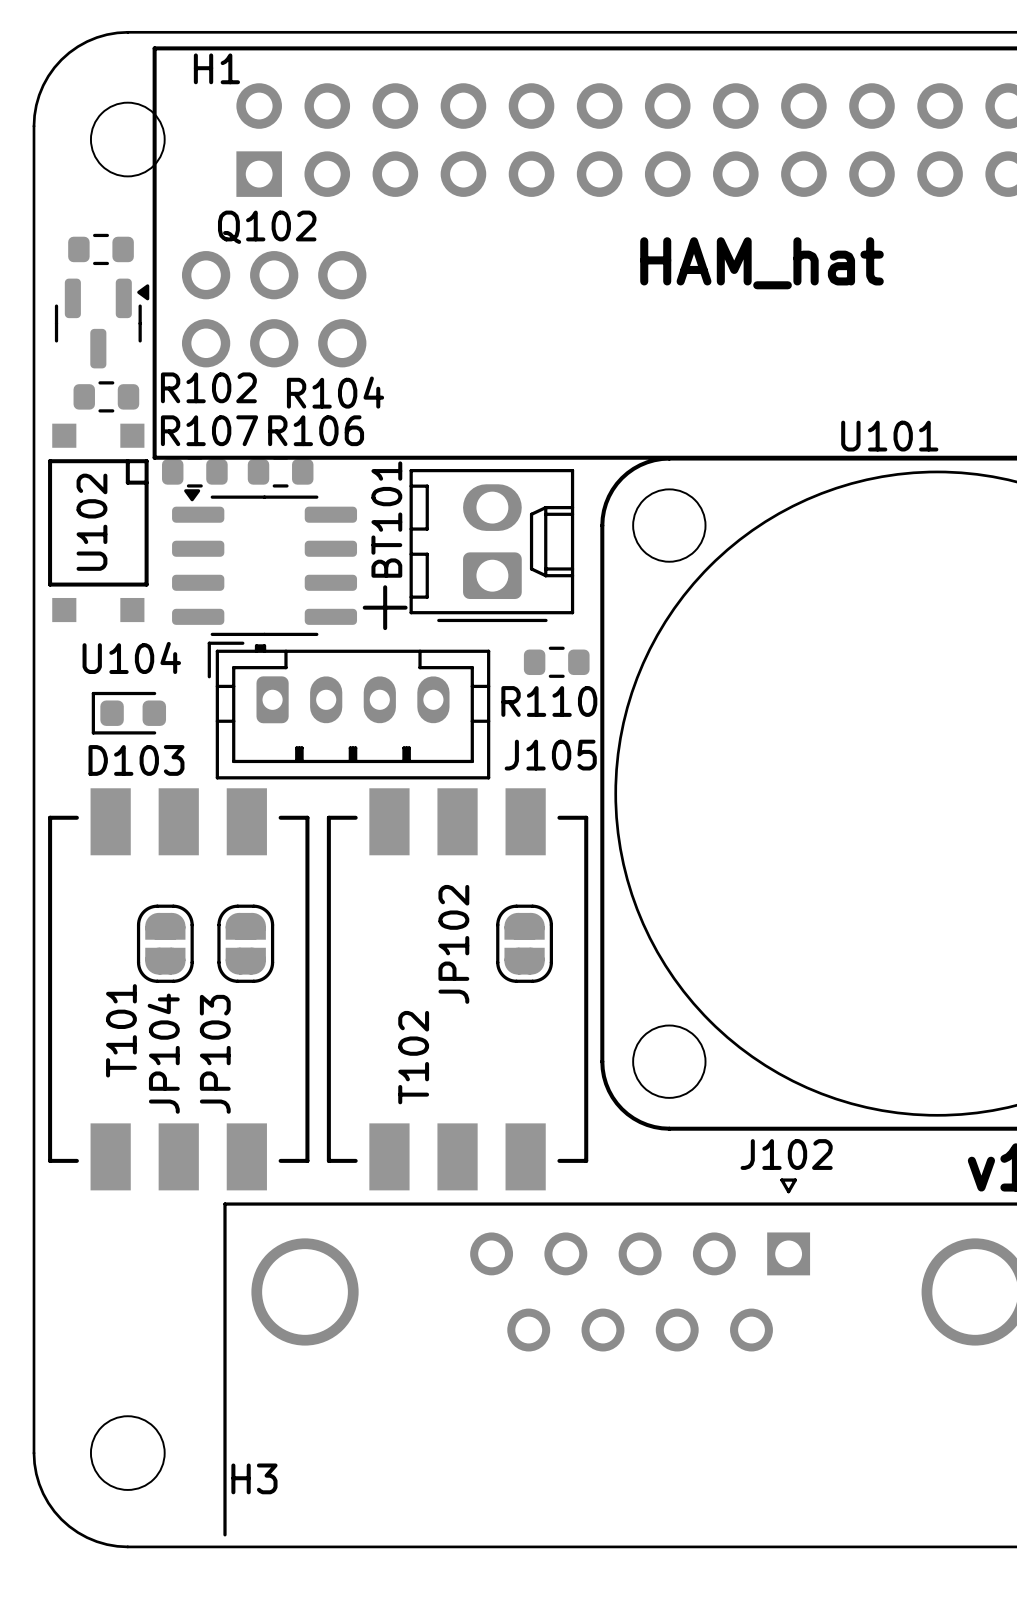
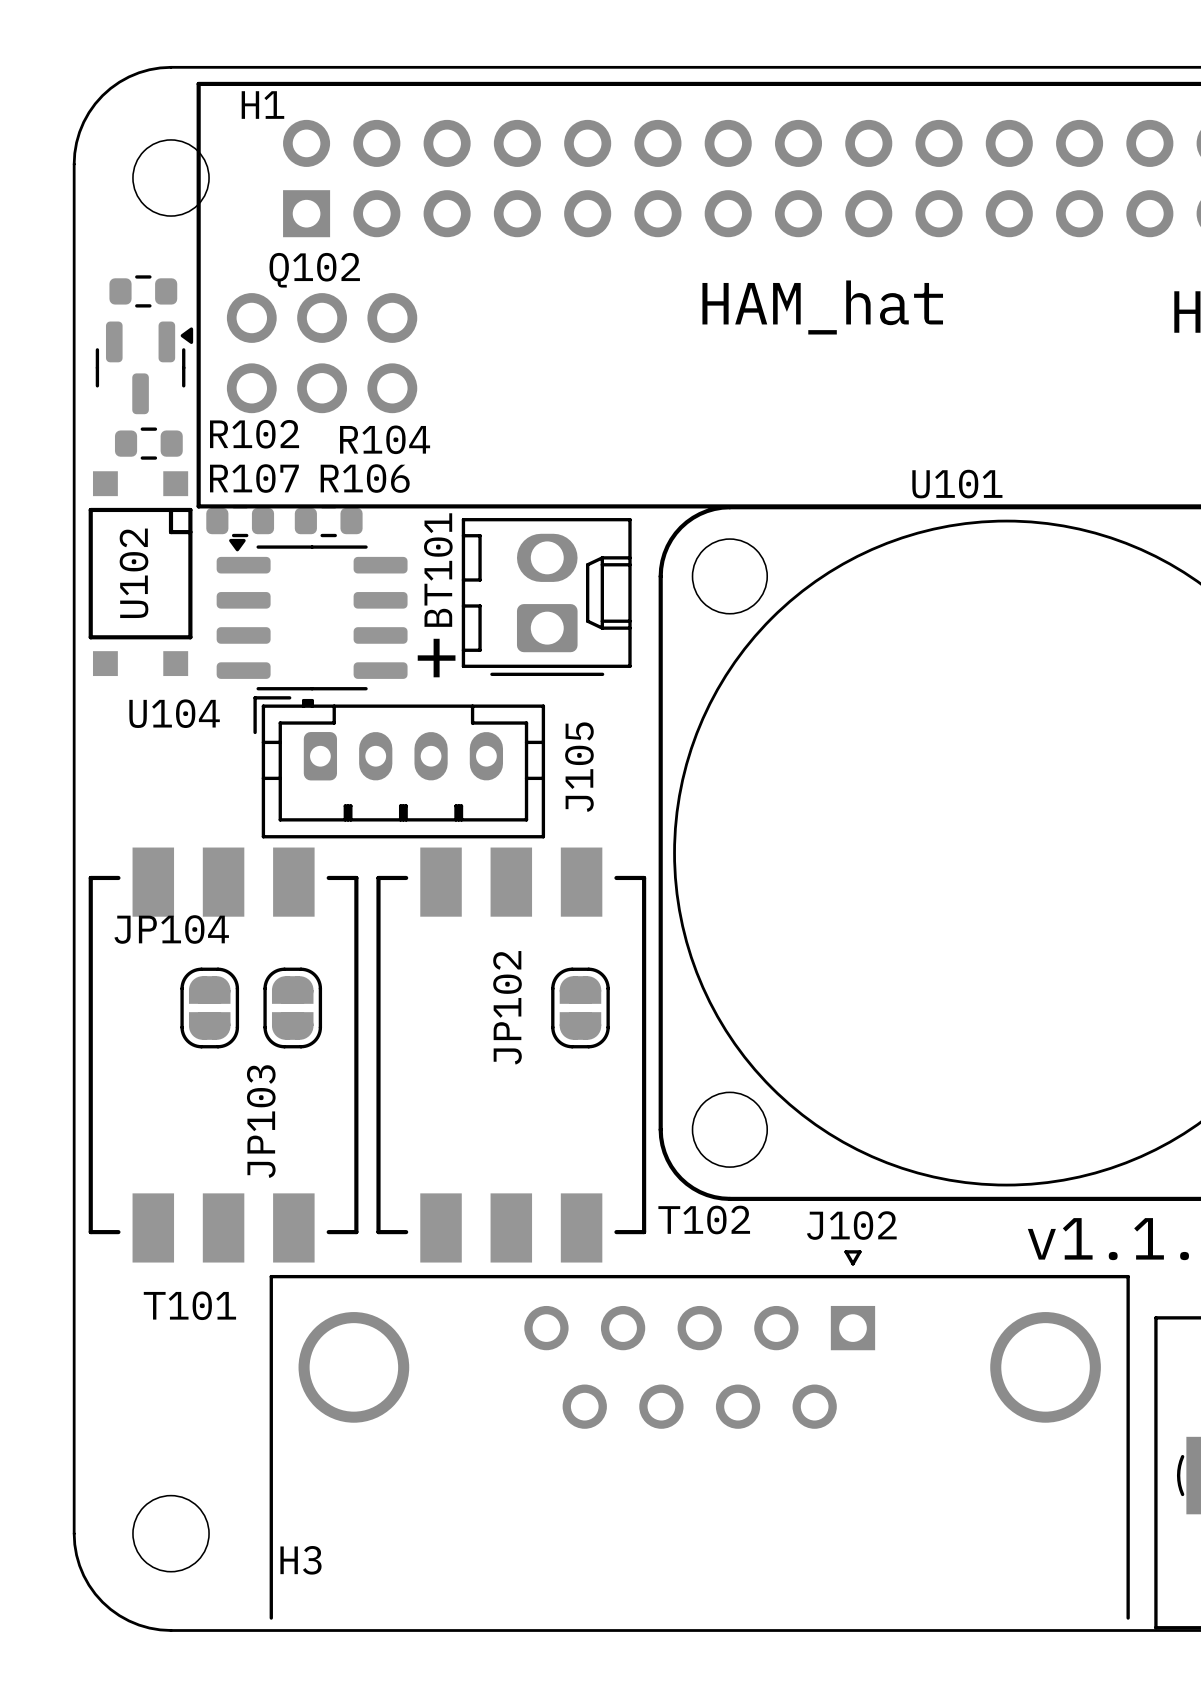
R110: (556, 662) -> none
D103: (128, 713) -> none
J105 name rotation: 0° (550, 755) -> 90° counterclockwise (579, 767)
T101 name rotation: 0° (121, 1030) -> 90° clockwise (189, 1305)
T101 name position: T101 (121, 1030) -> T101 (189, 1305)
JP104 name rotation: 0° (163, 1053) -> 90° clockwise (171, 929)
JP104 name position: JP104 (163, 1053) -> JP104 (171, 929)
T102 name rotation: 0° (413, 1057) -> 90° clockwise (704, 1220)
T102 name position: T102 (413, 1057) -> T102 (704, 1220)

